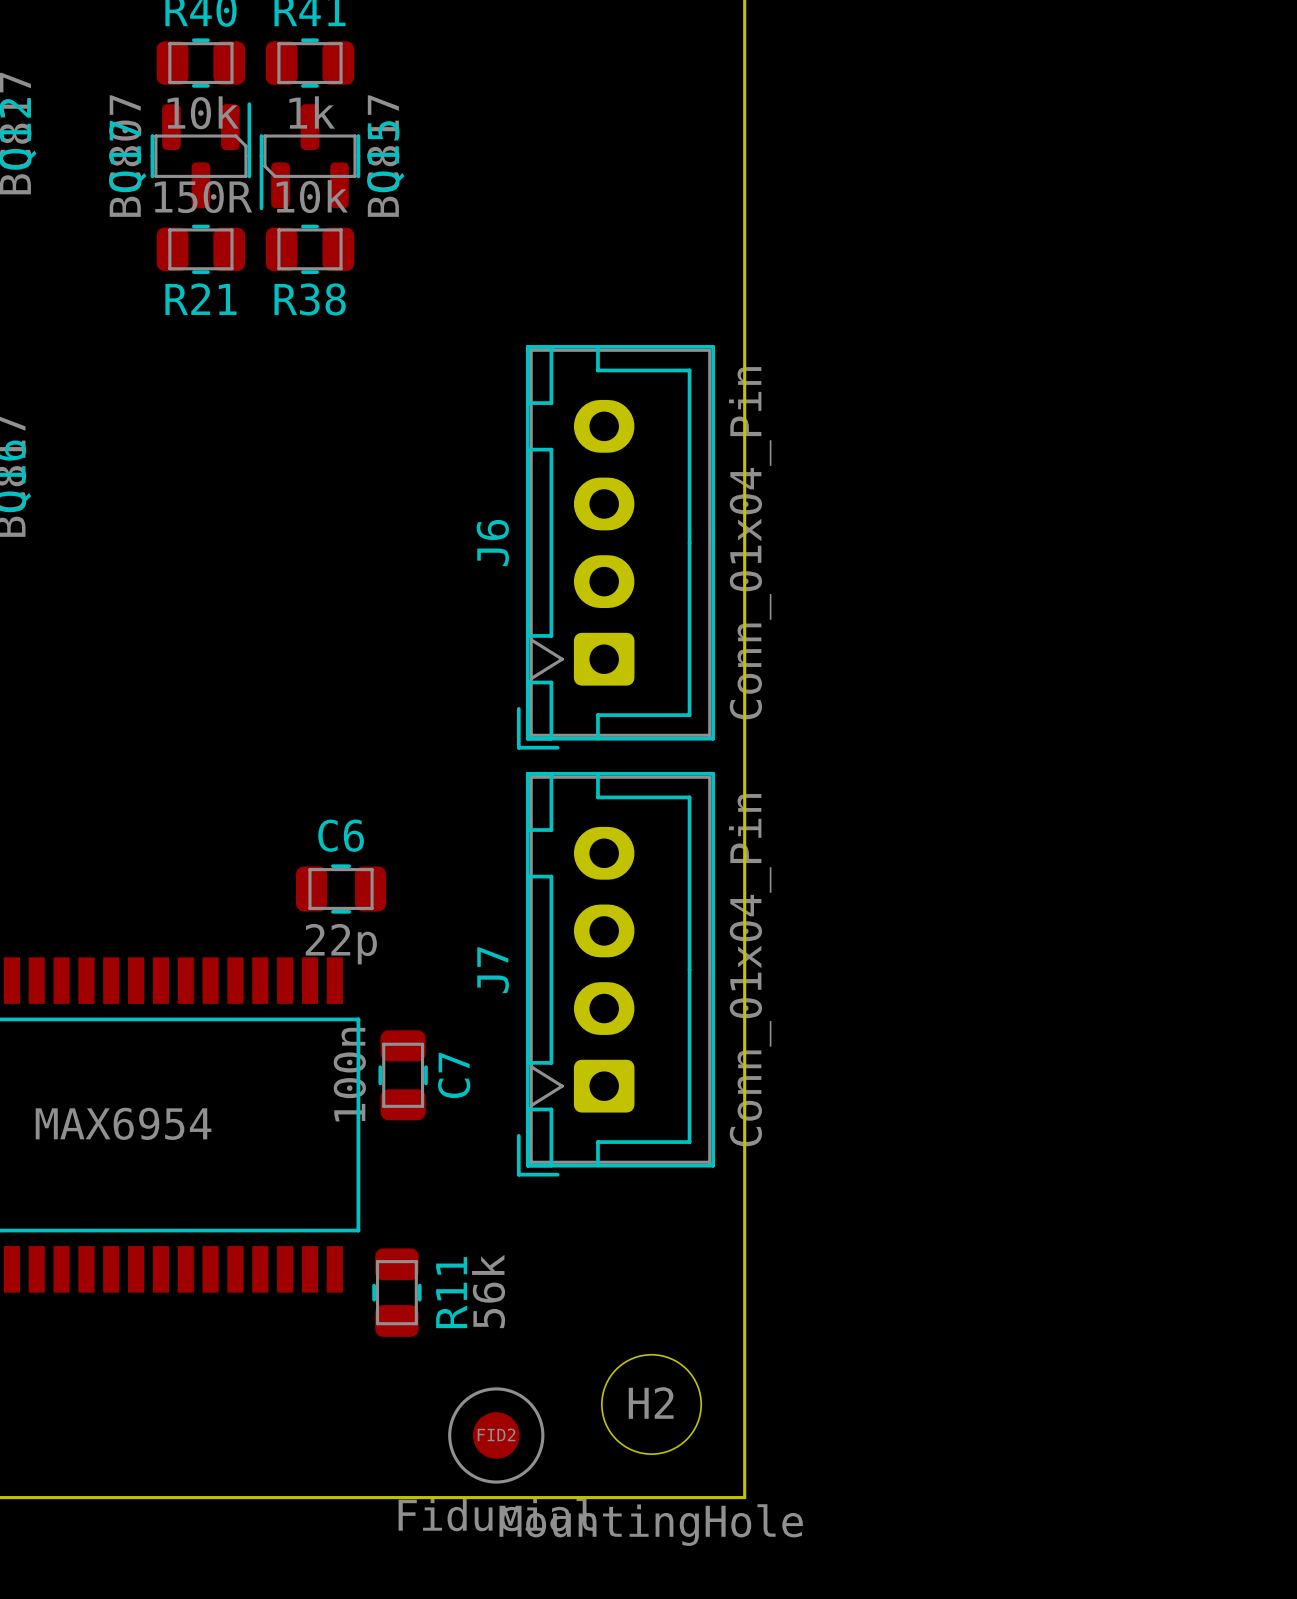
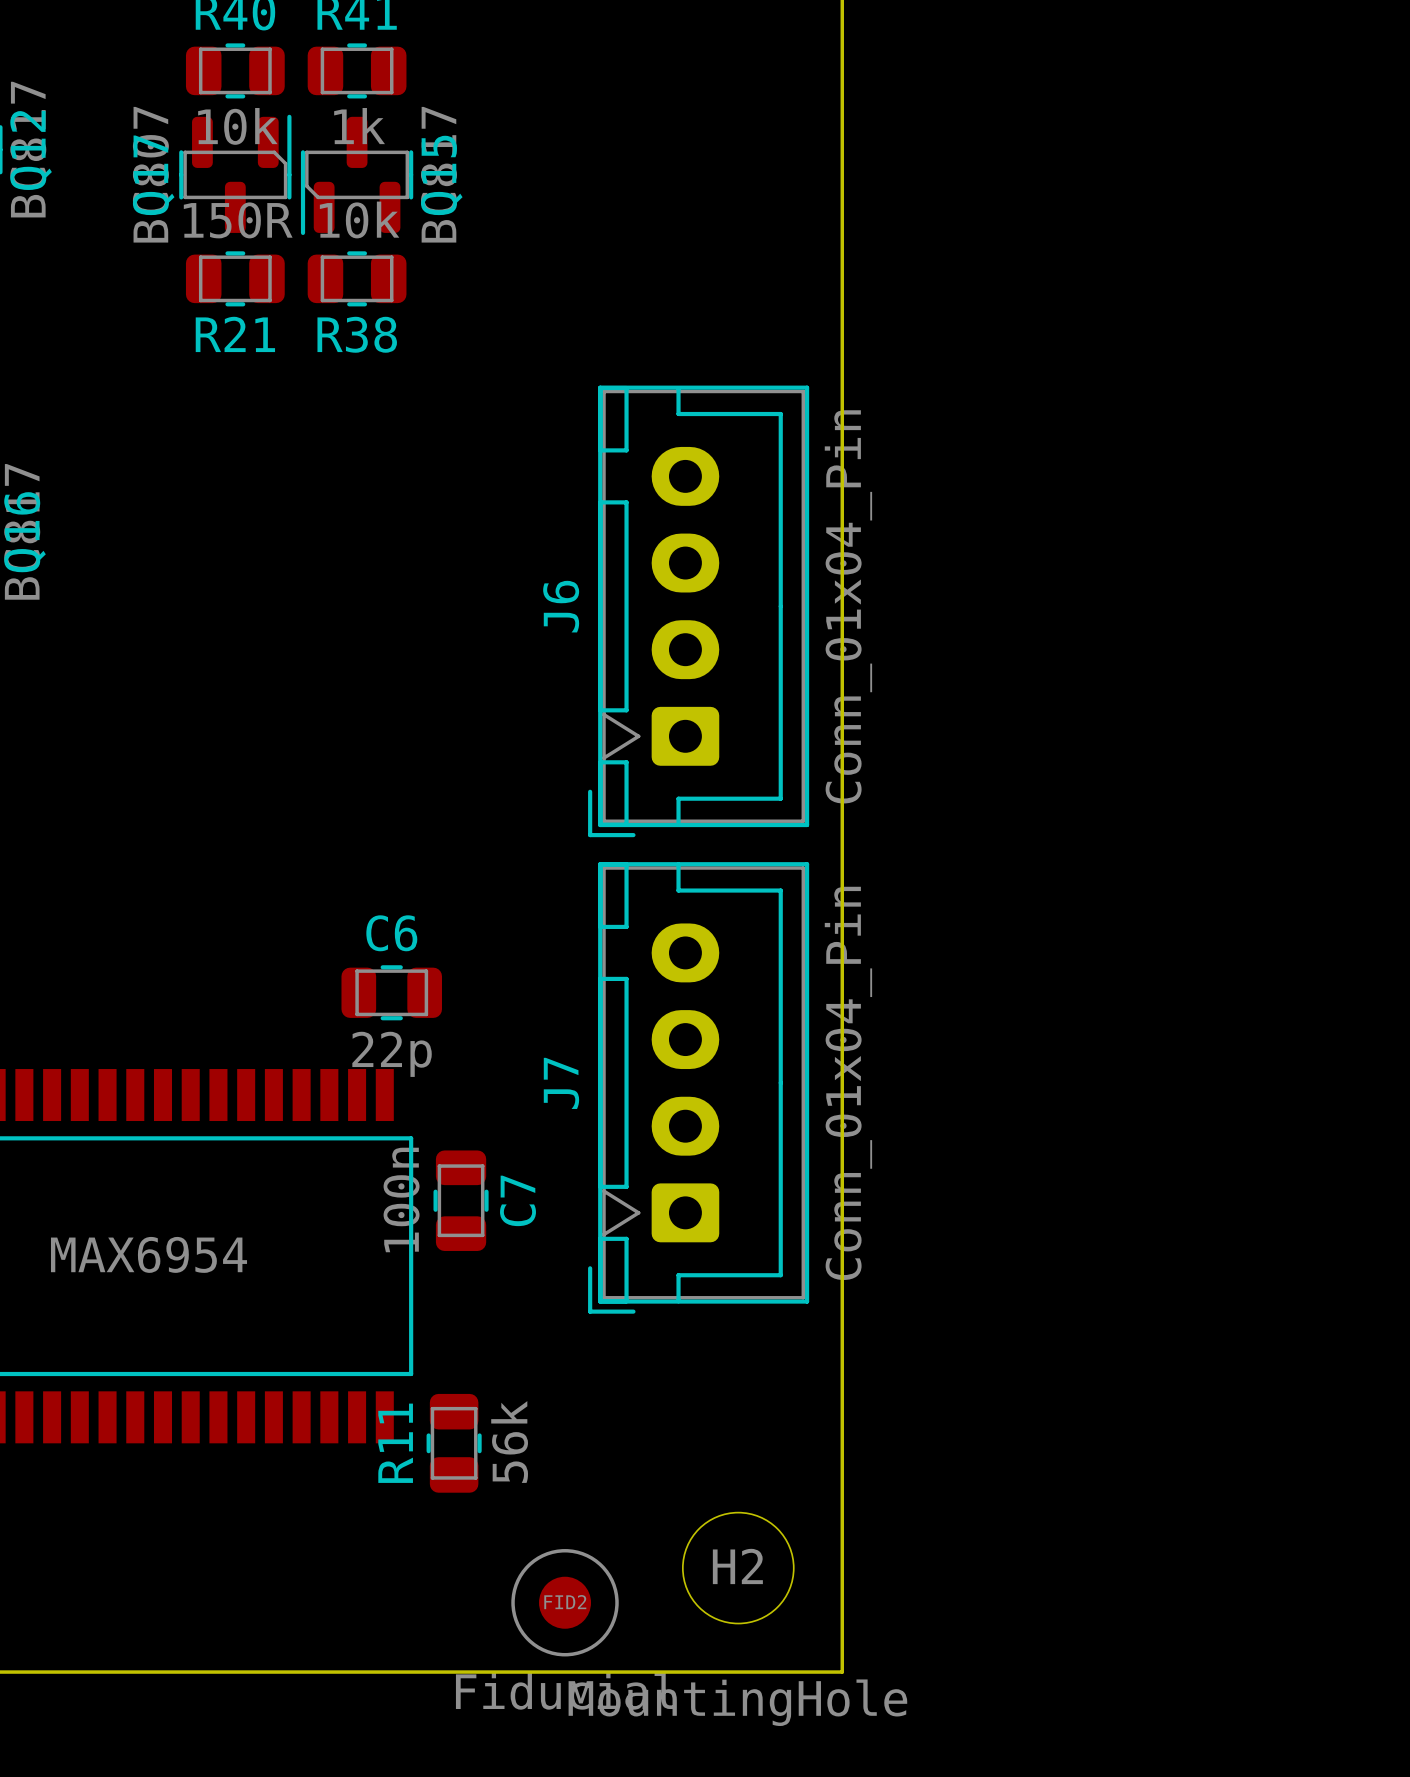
R11 value position: 56k (488, 1291) -> 56k (509, 1442)
R11 name position: R11 (451, 1292) -> R11 (395, 1443)

